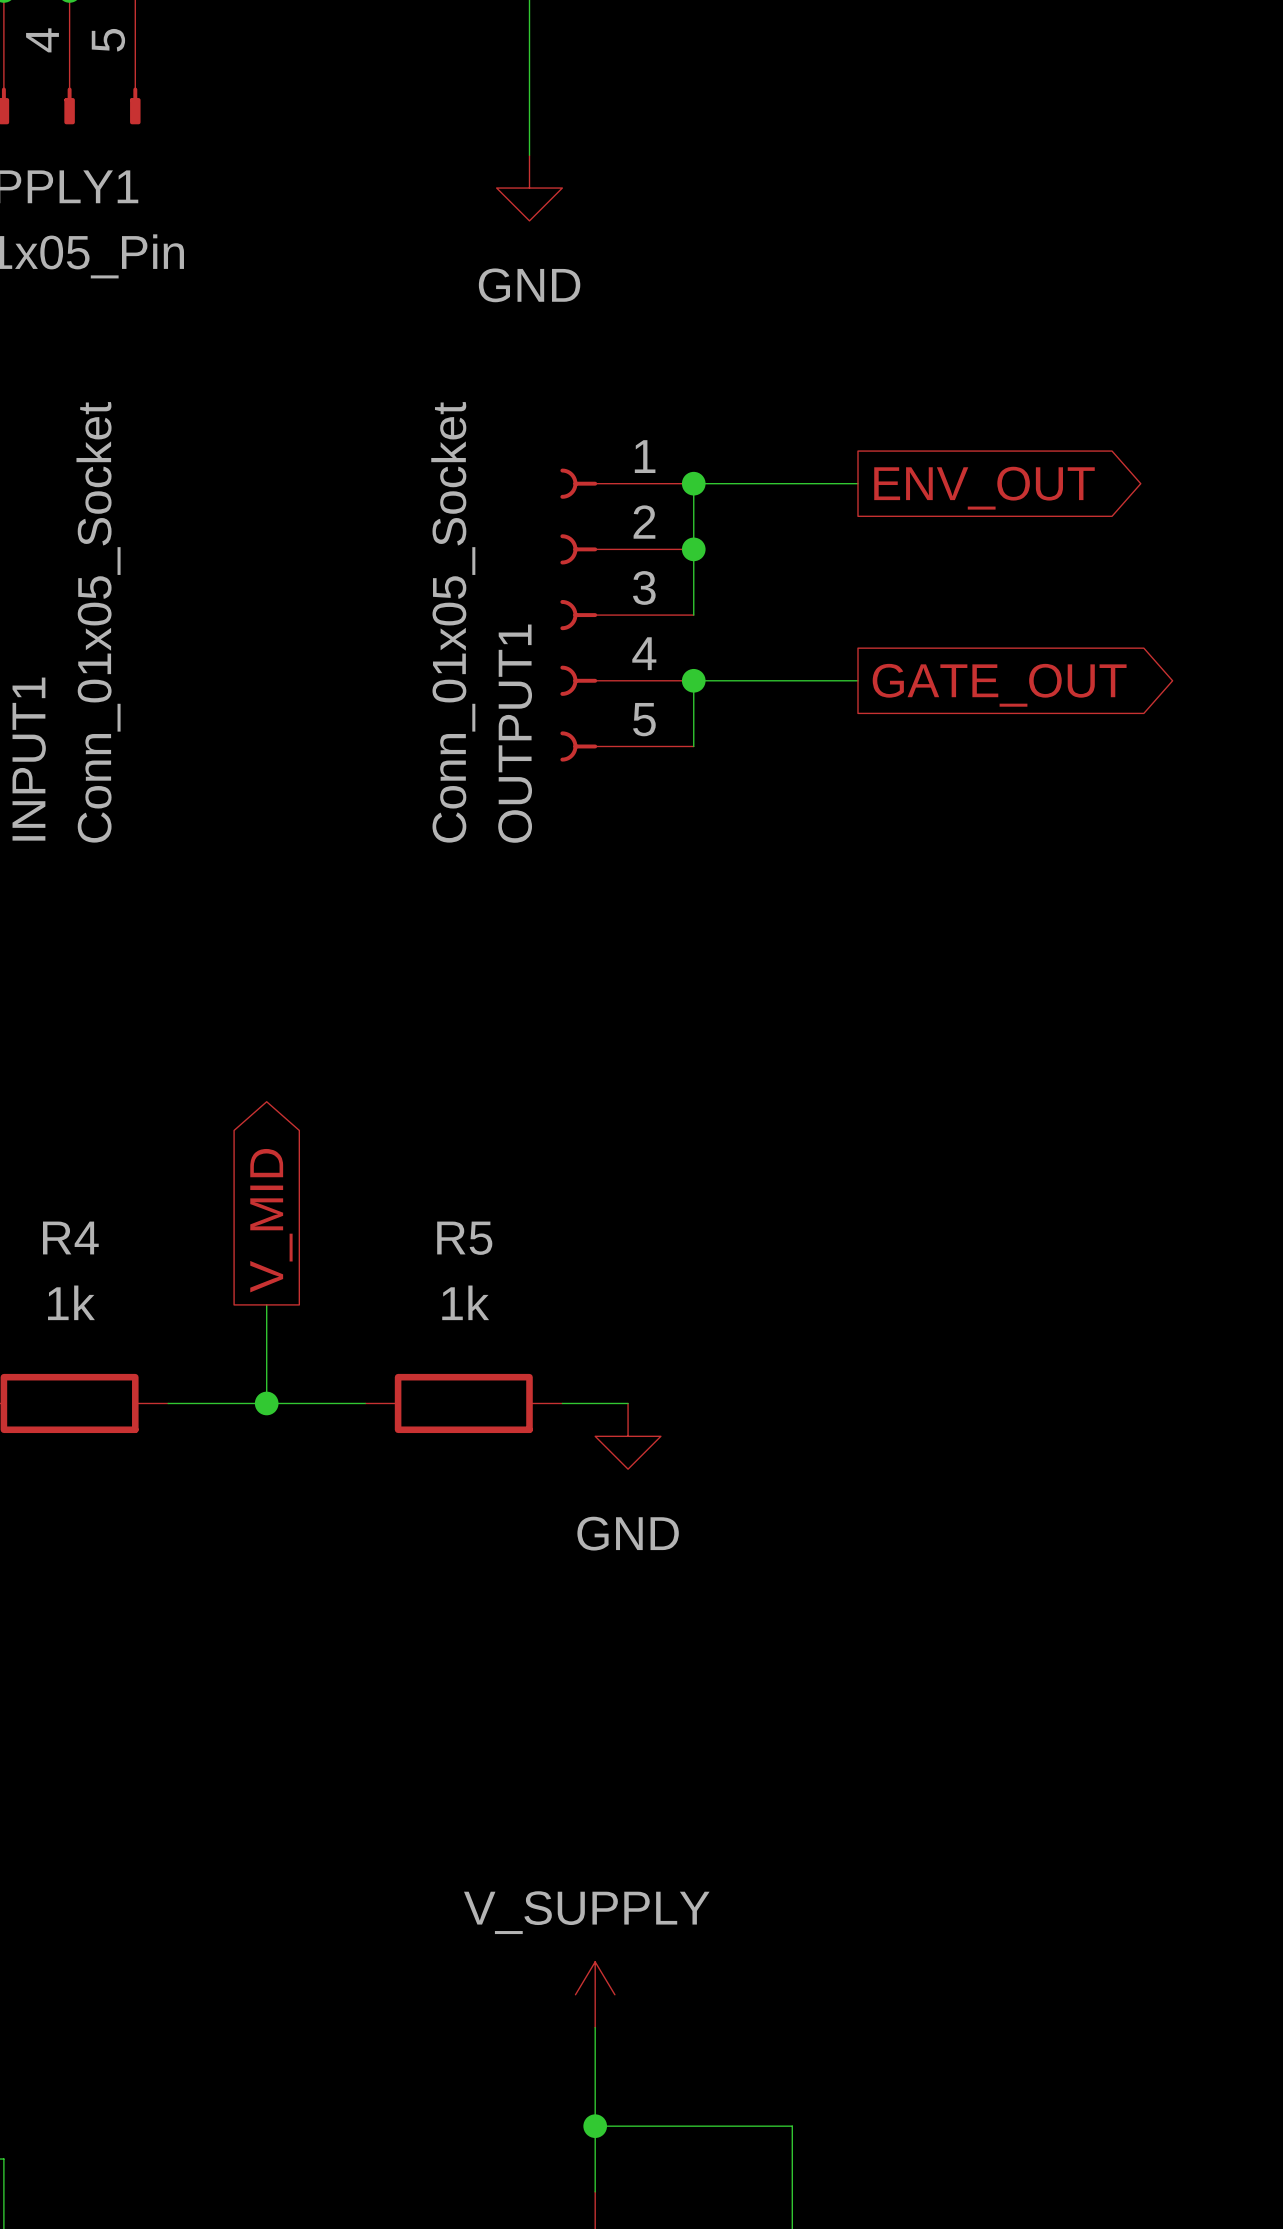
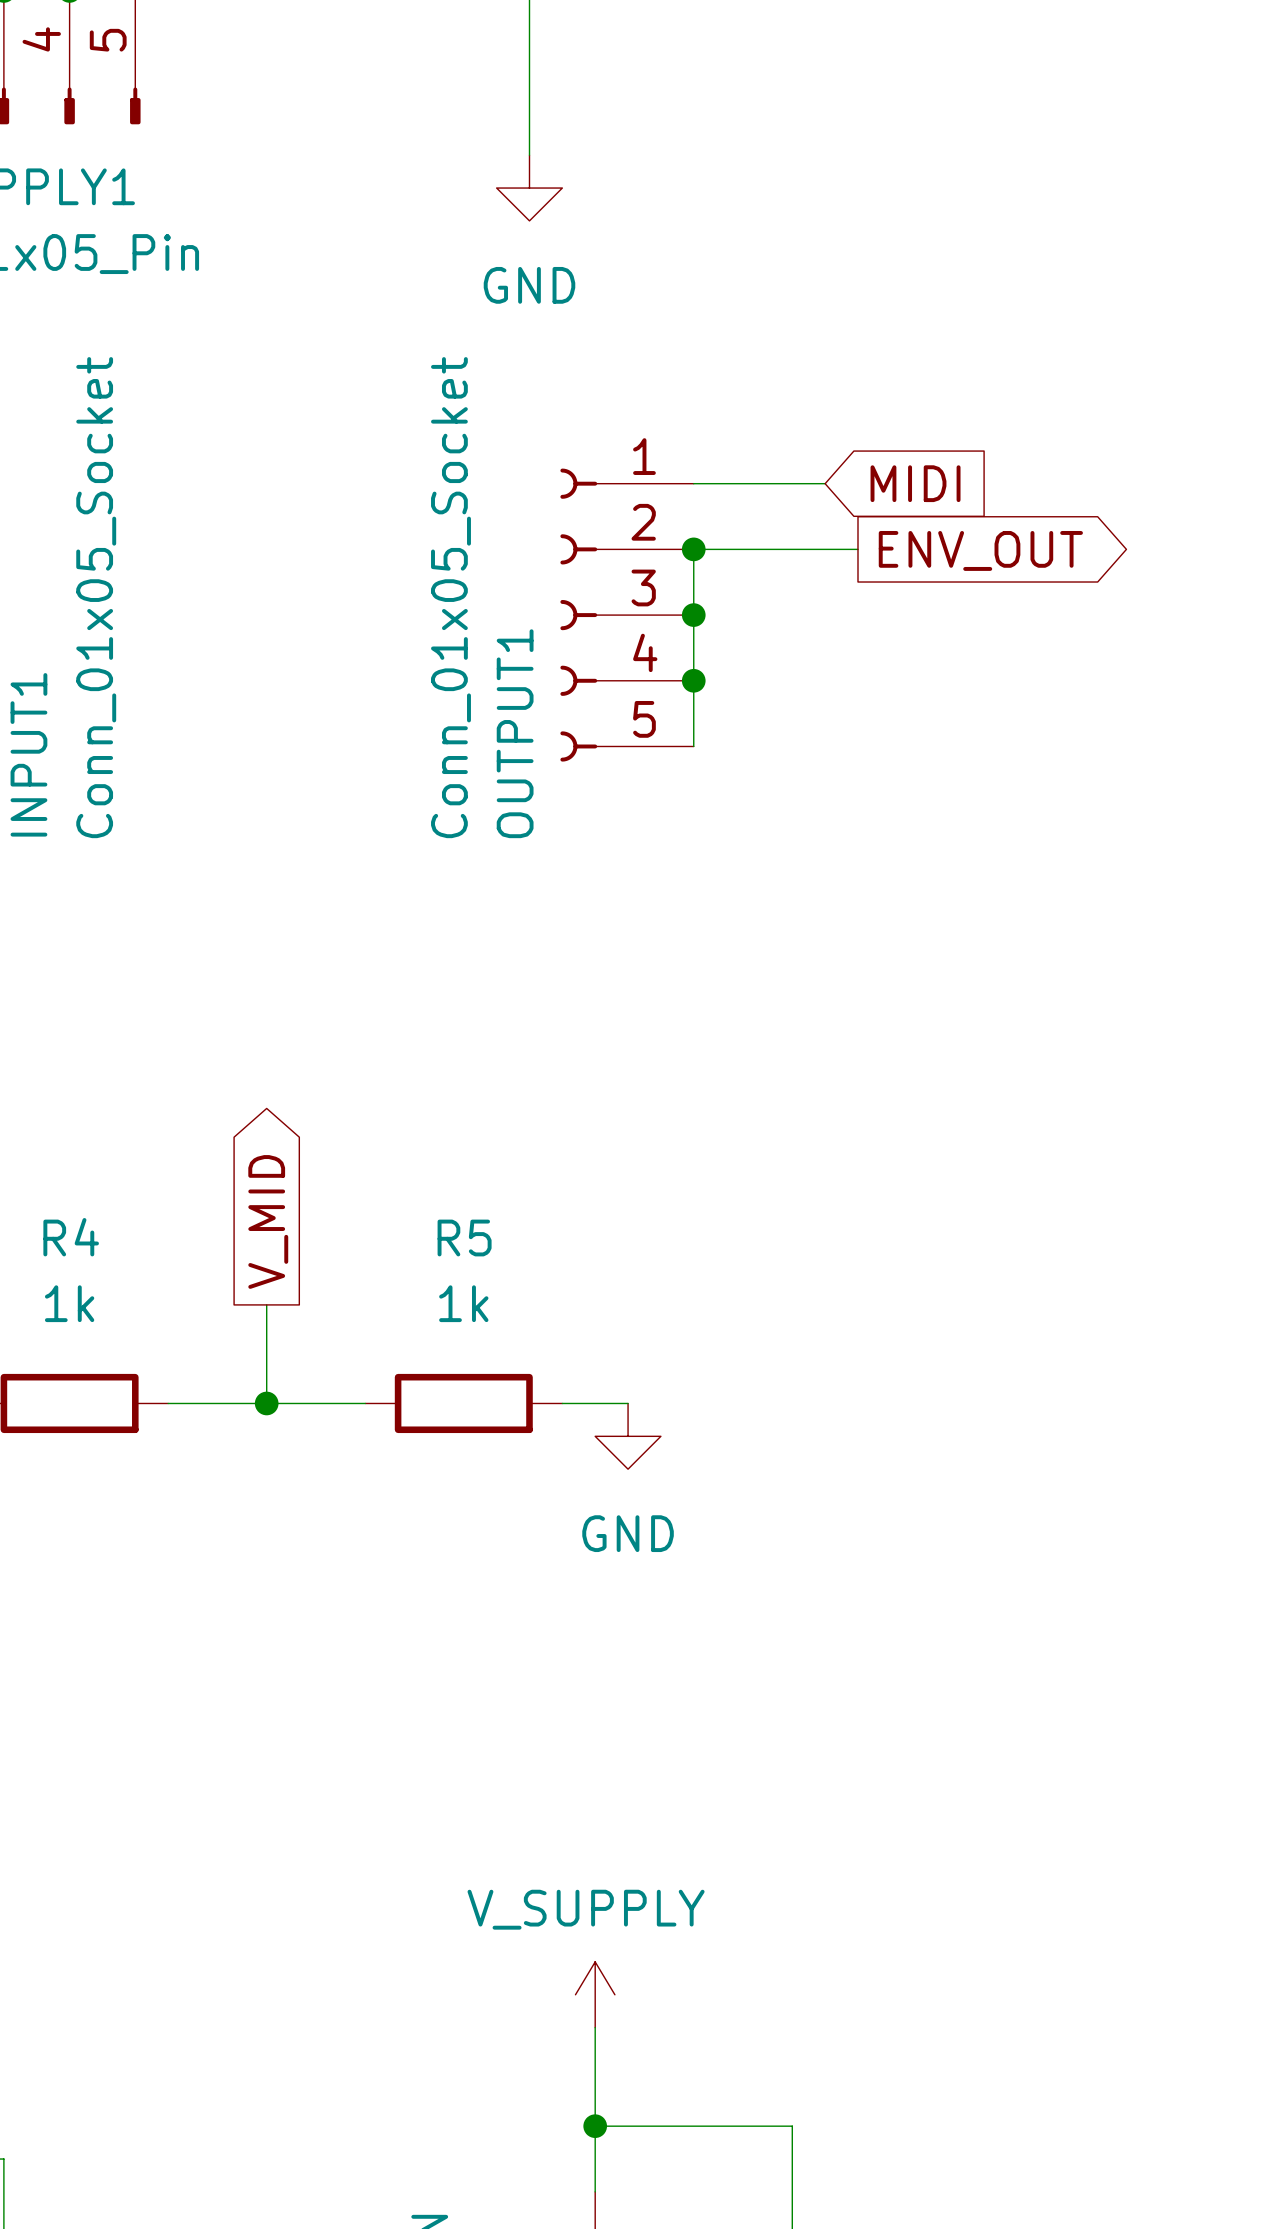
wire: (693, 483) (693, 549) -> (857, 549) (693, 549)
junction position: (693, 483) -> (693, 615)
wire: (825, 483) (857, 483) -> none
global label: none -> MIDI (915, 483)
global label position: ENV_OUT (984, 488) -> ENV_OUT (980, 550)
wire: (693, 680) (857, 680) -> (693, 680) (693, 615)
global label: GATE_OUT (999, 685) -> none

